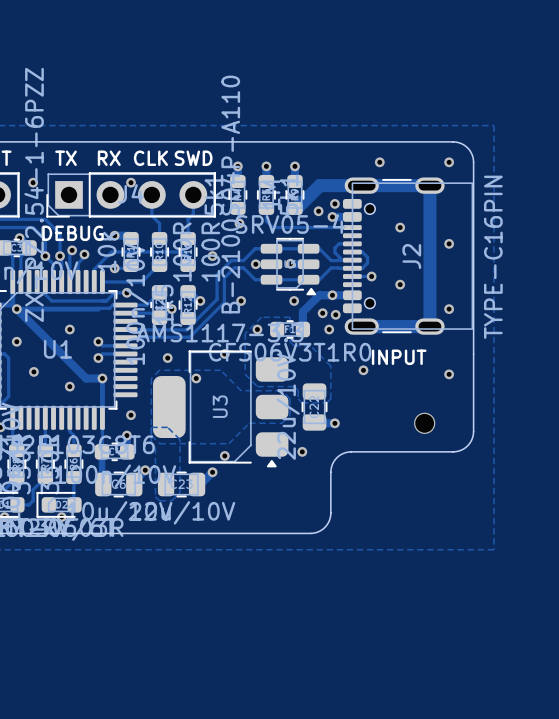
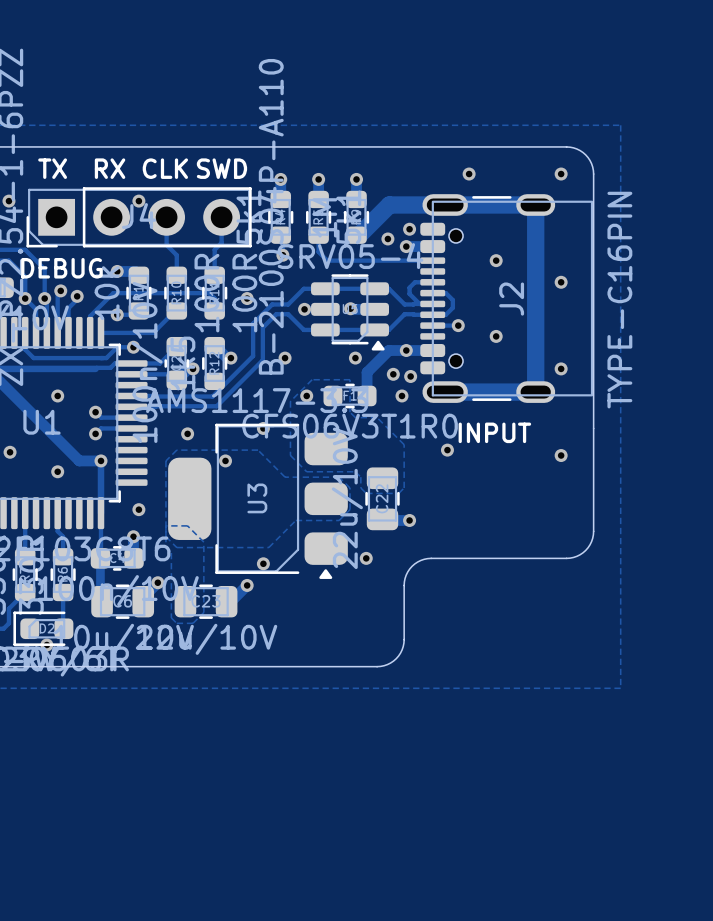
via: (424, 423) -> none

